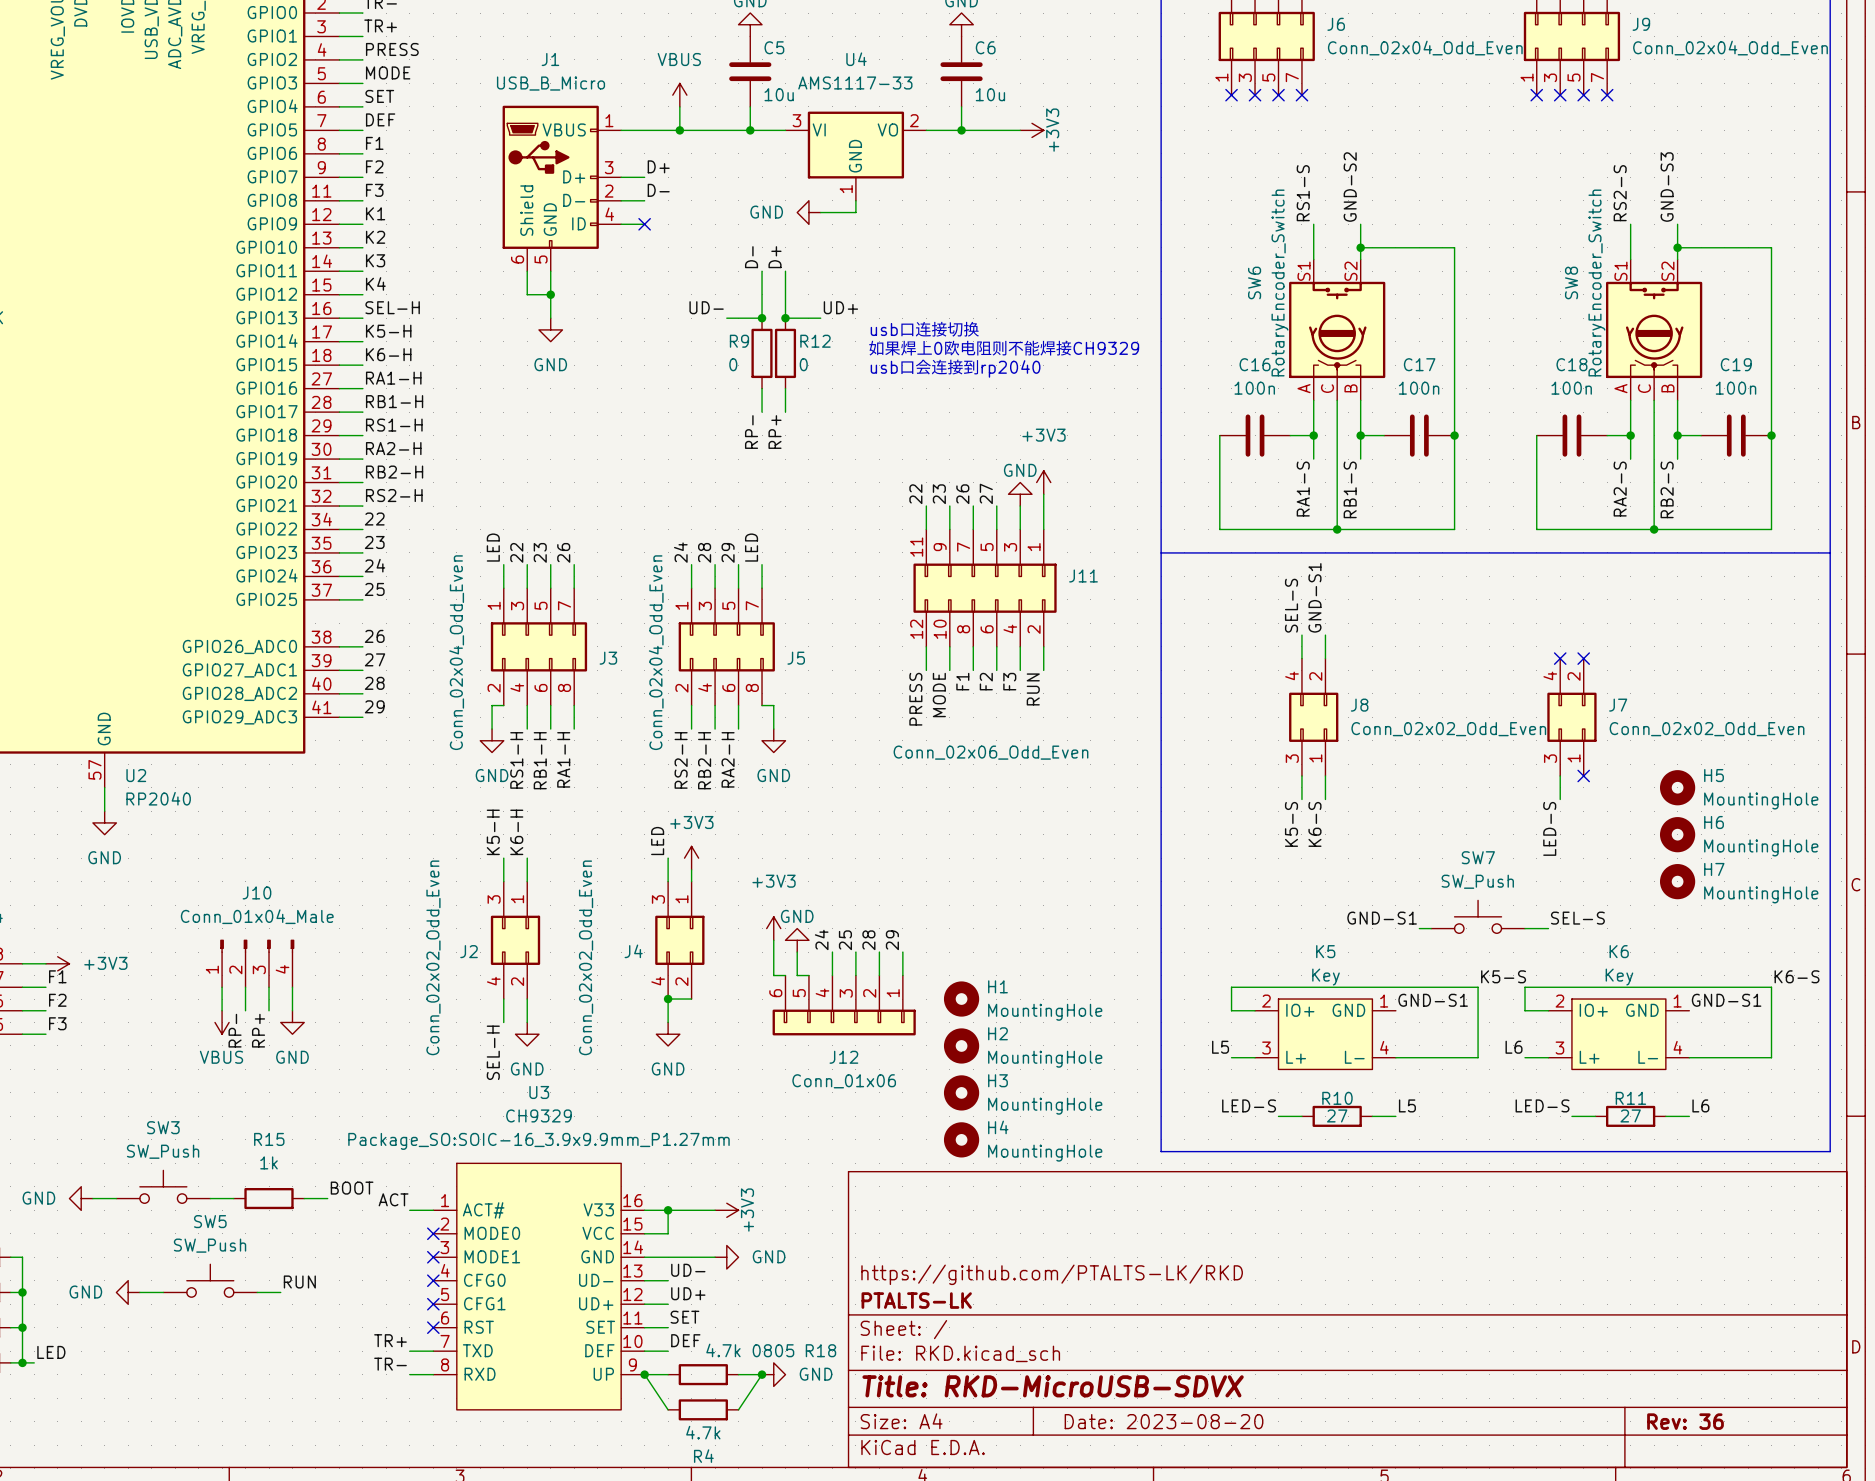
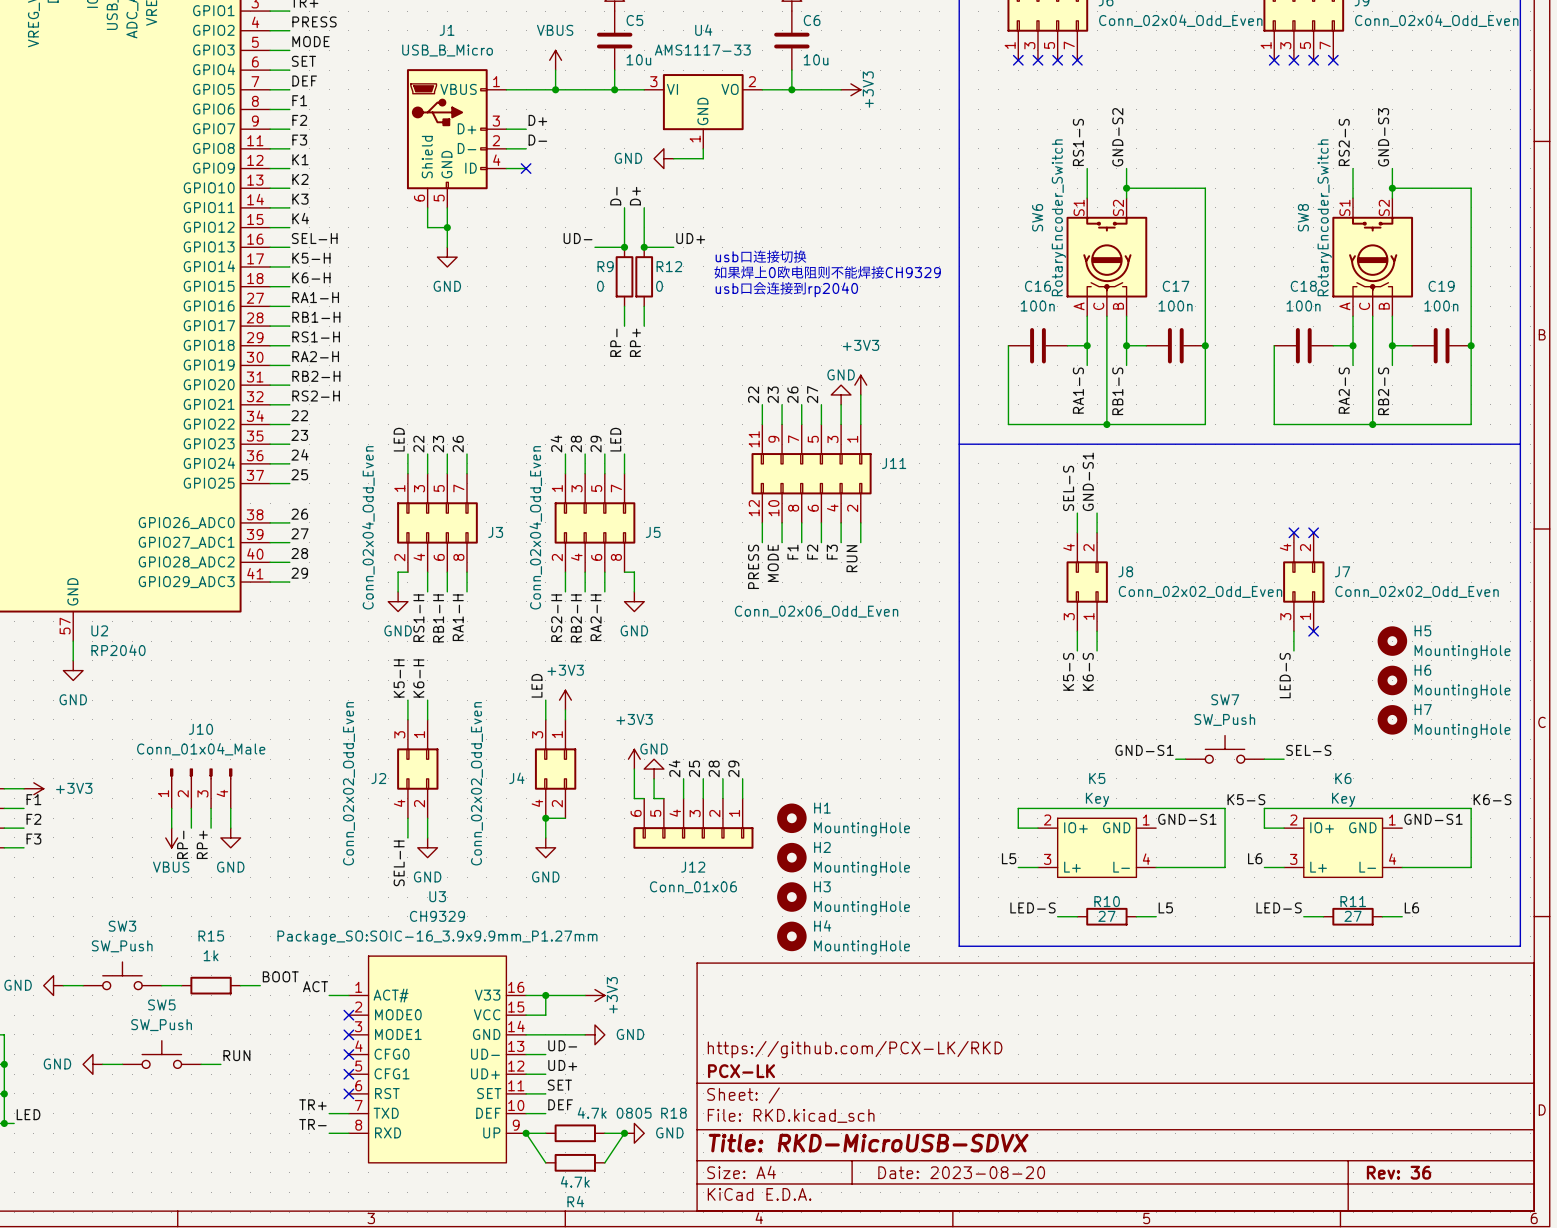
title block: https://github.com/PTALTS-LK/RKD (1052, 1274) -> https://github.com/PCX-LK/RKD (855, 1049)
title block: PTALTS-LK (916, 1300) -> PCX-LK (741, 1071)

